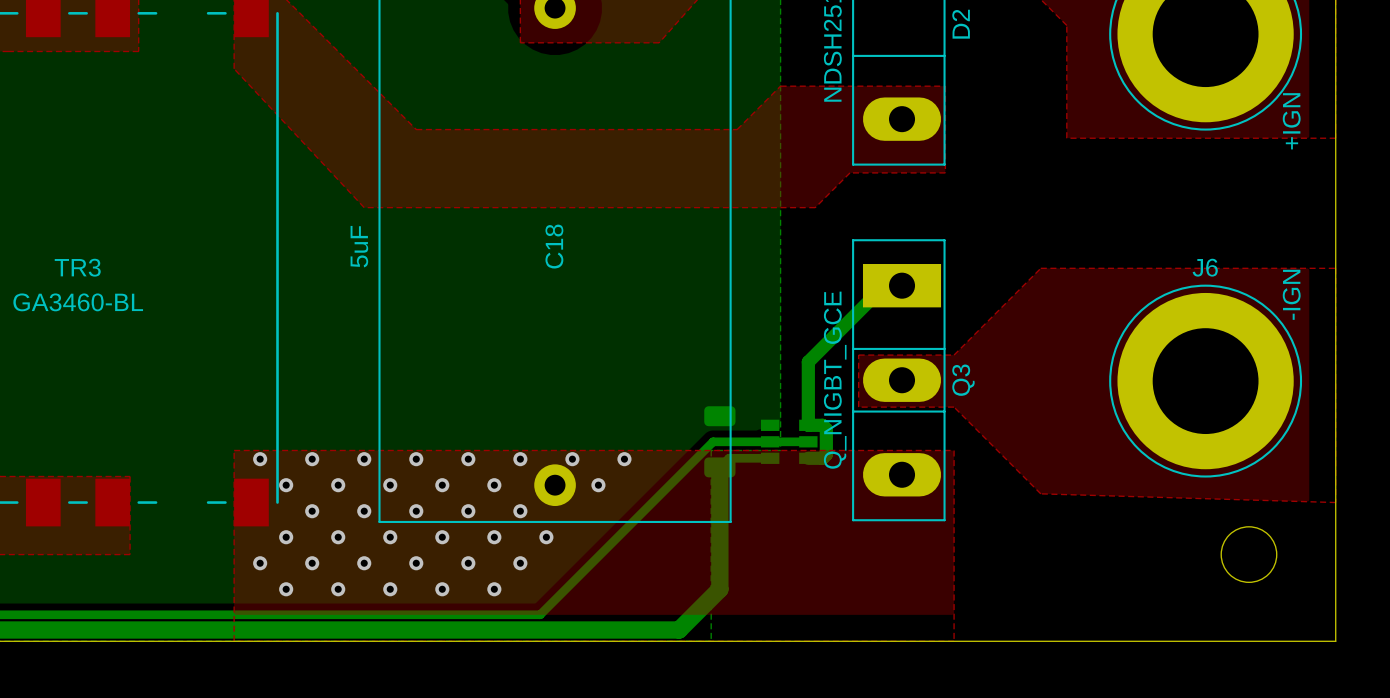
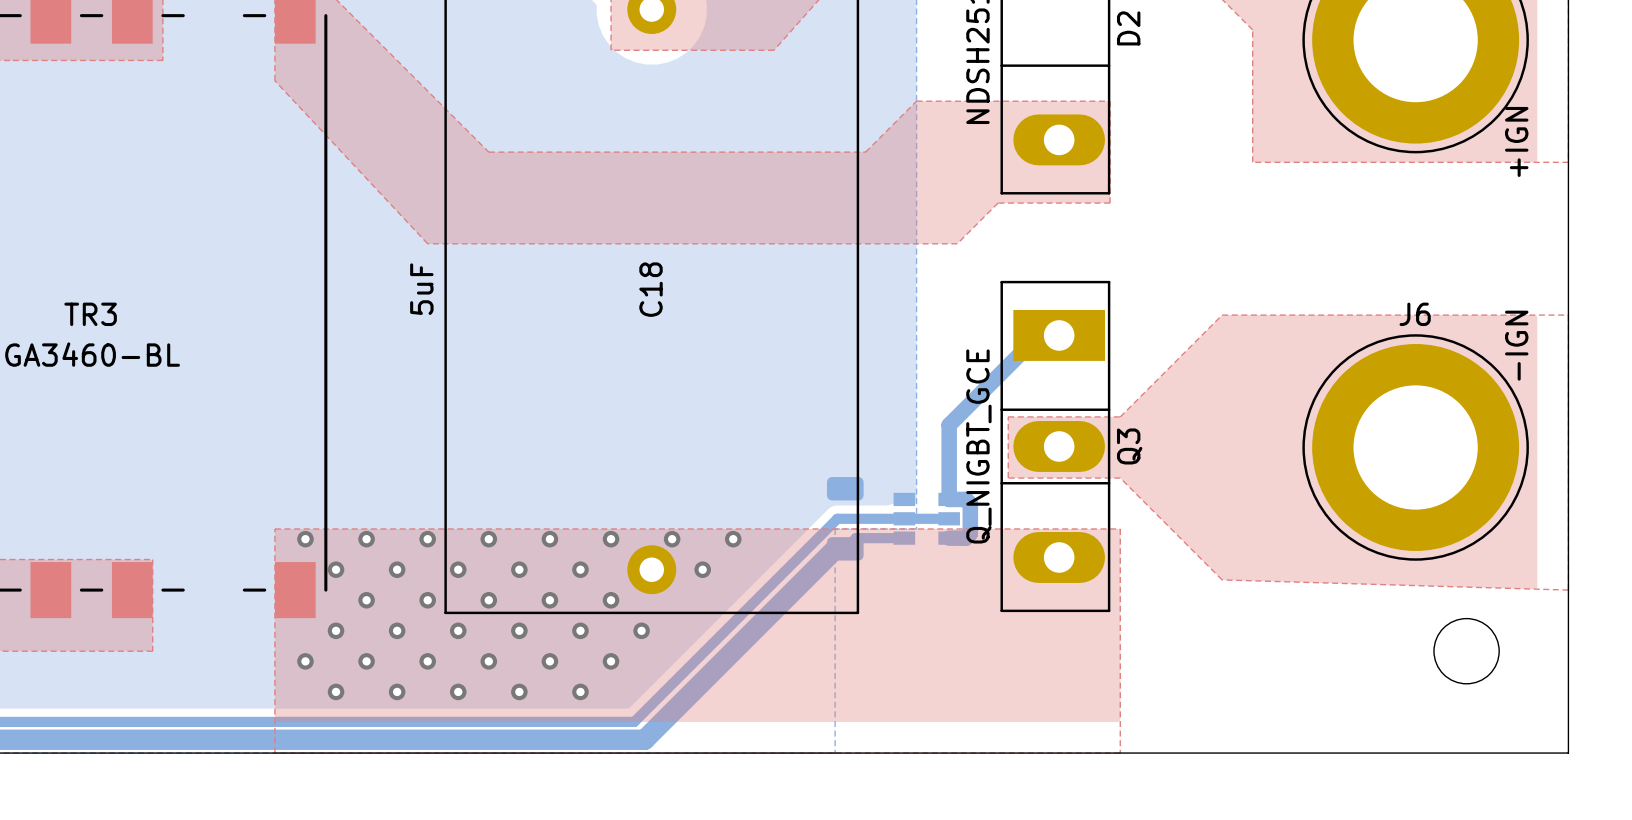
bottom track: (719, 467) (719, 589) (679, 630) (549, 630) -> (845, 548) (835, 548) (644, 739)

